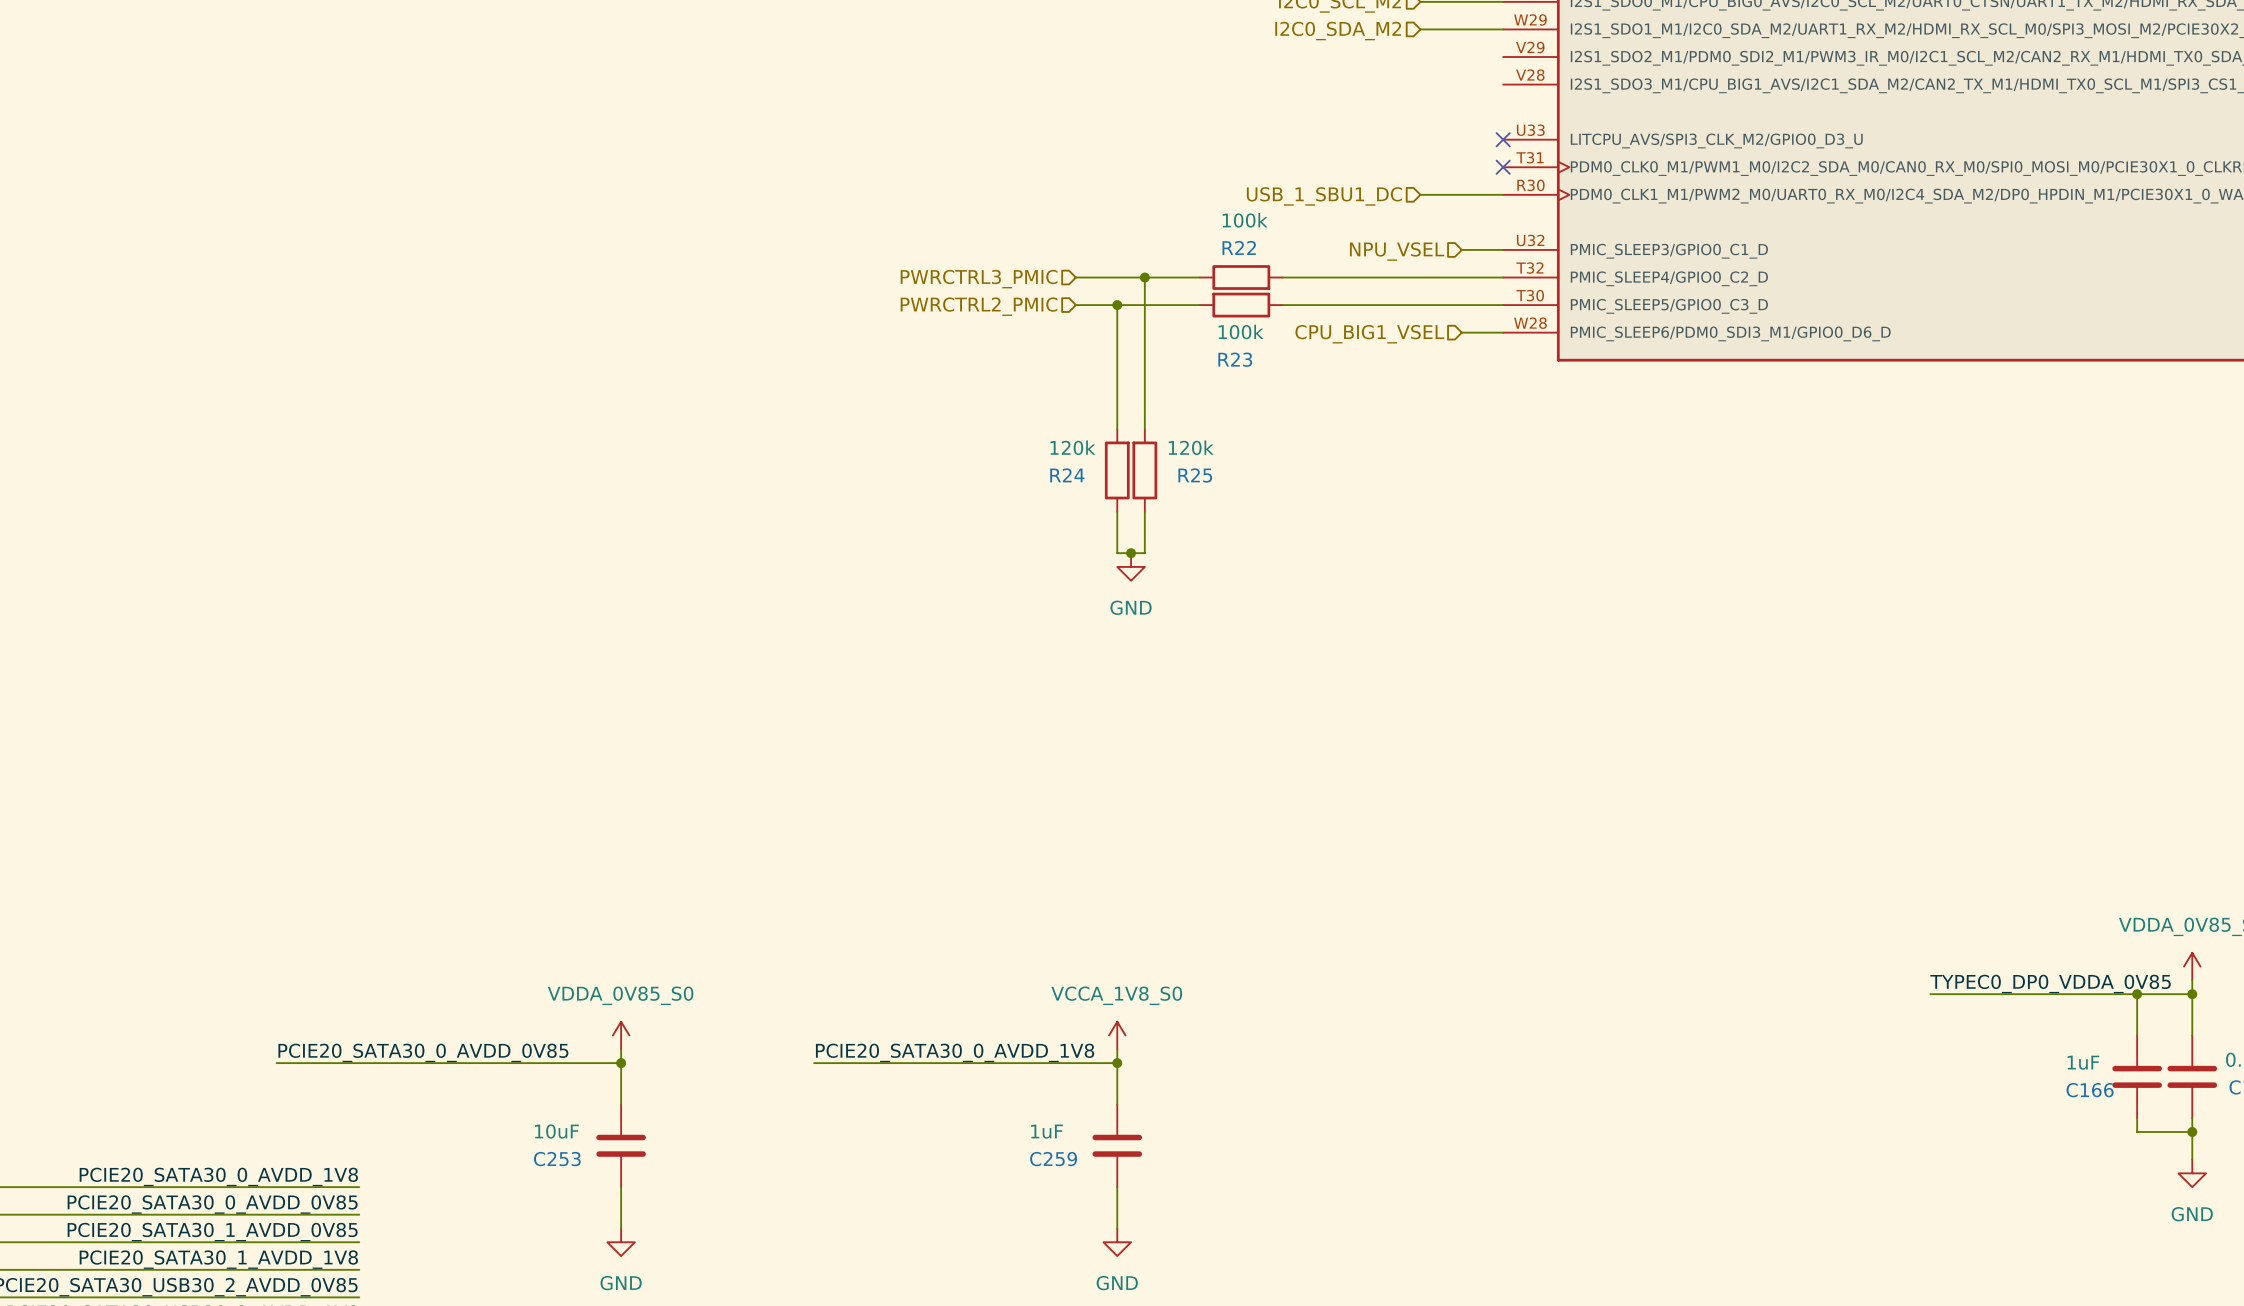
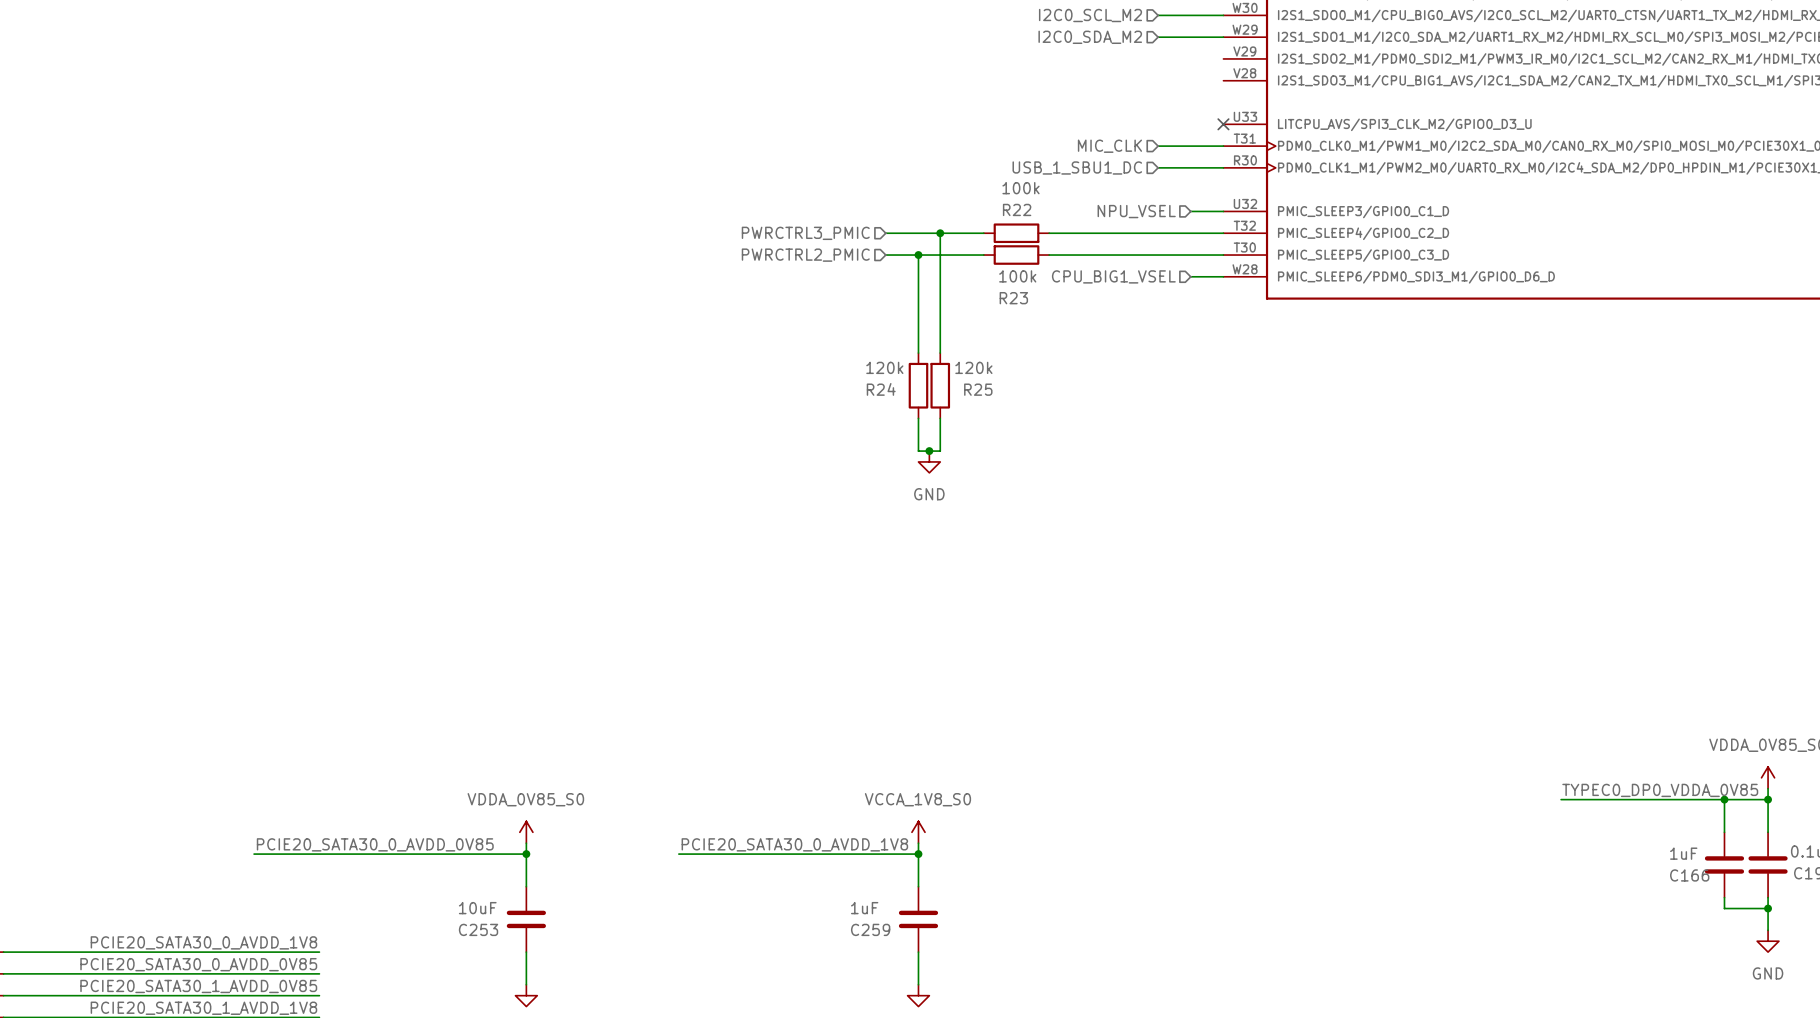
wire: none -> (1158, 146) (1223, 146)
no-connect mark: (1503, 167) -> none
hierarchical label: none -> MIC_CLK (1109, 146)

